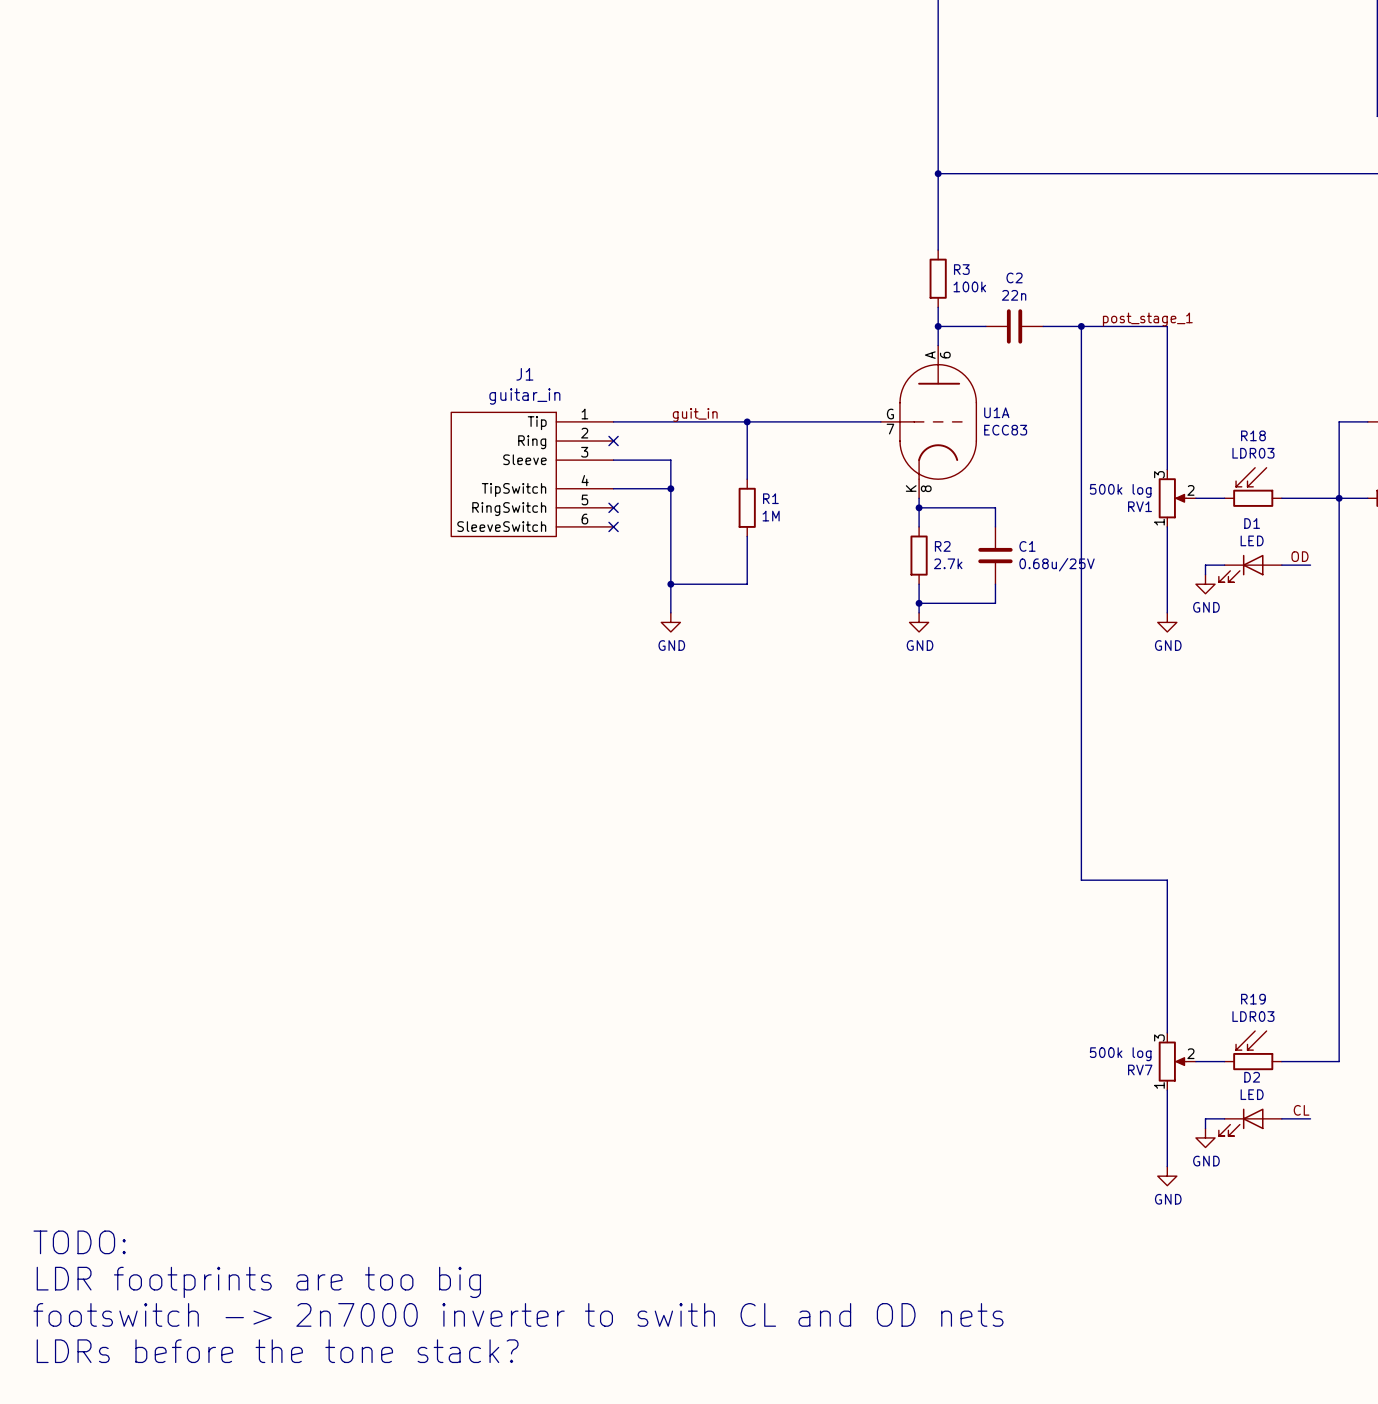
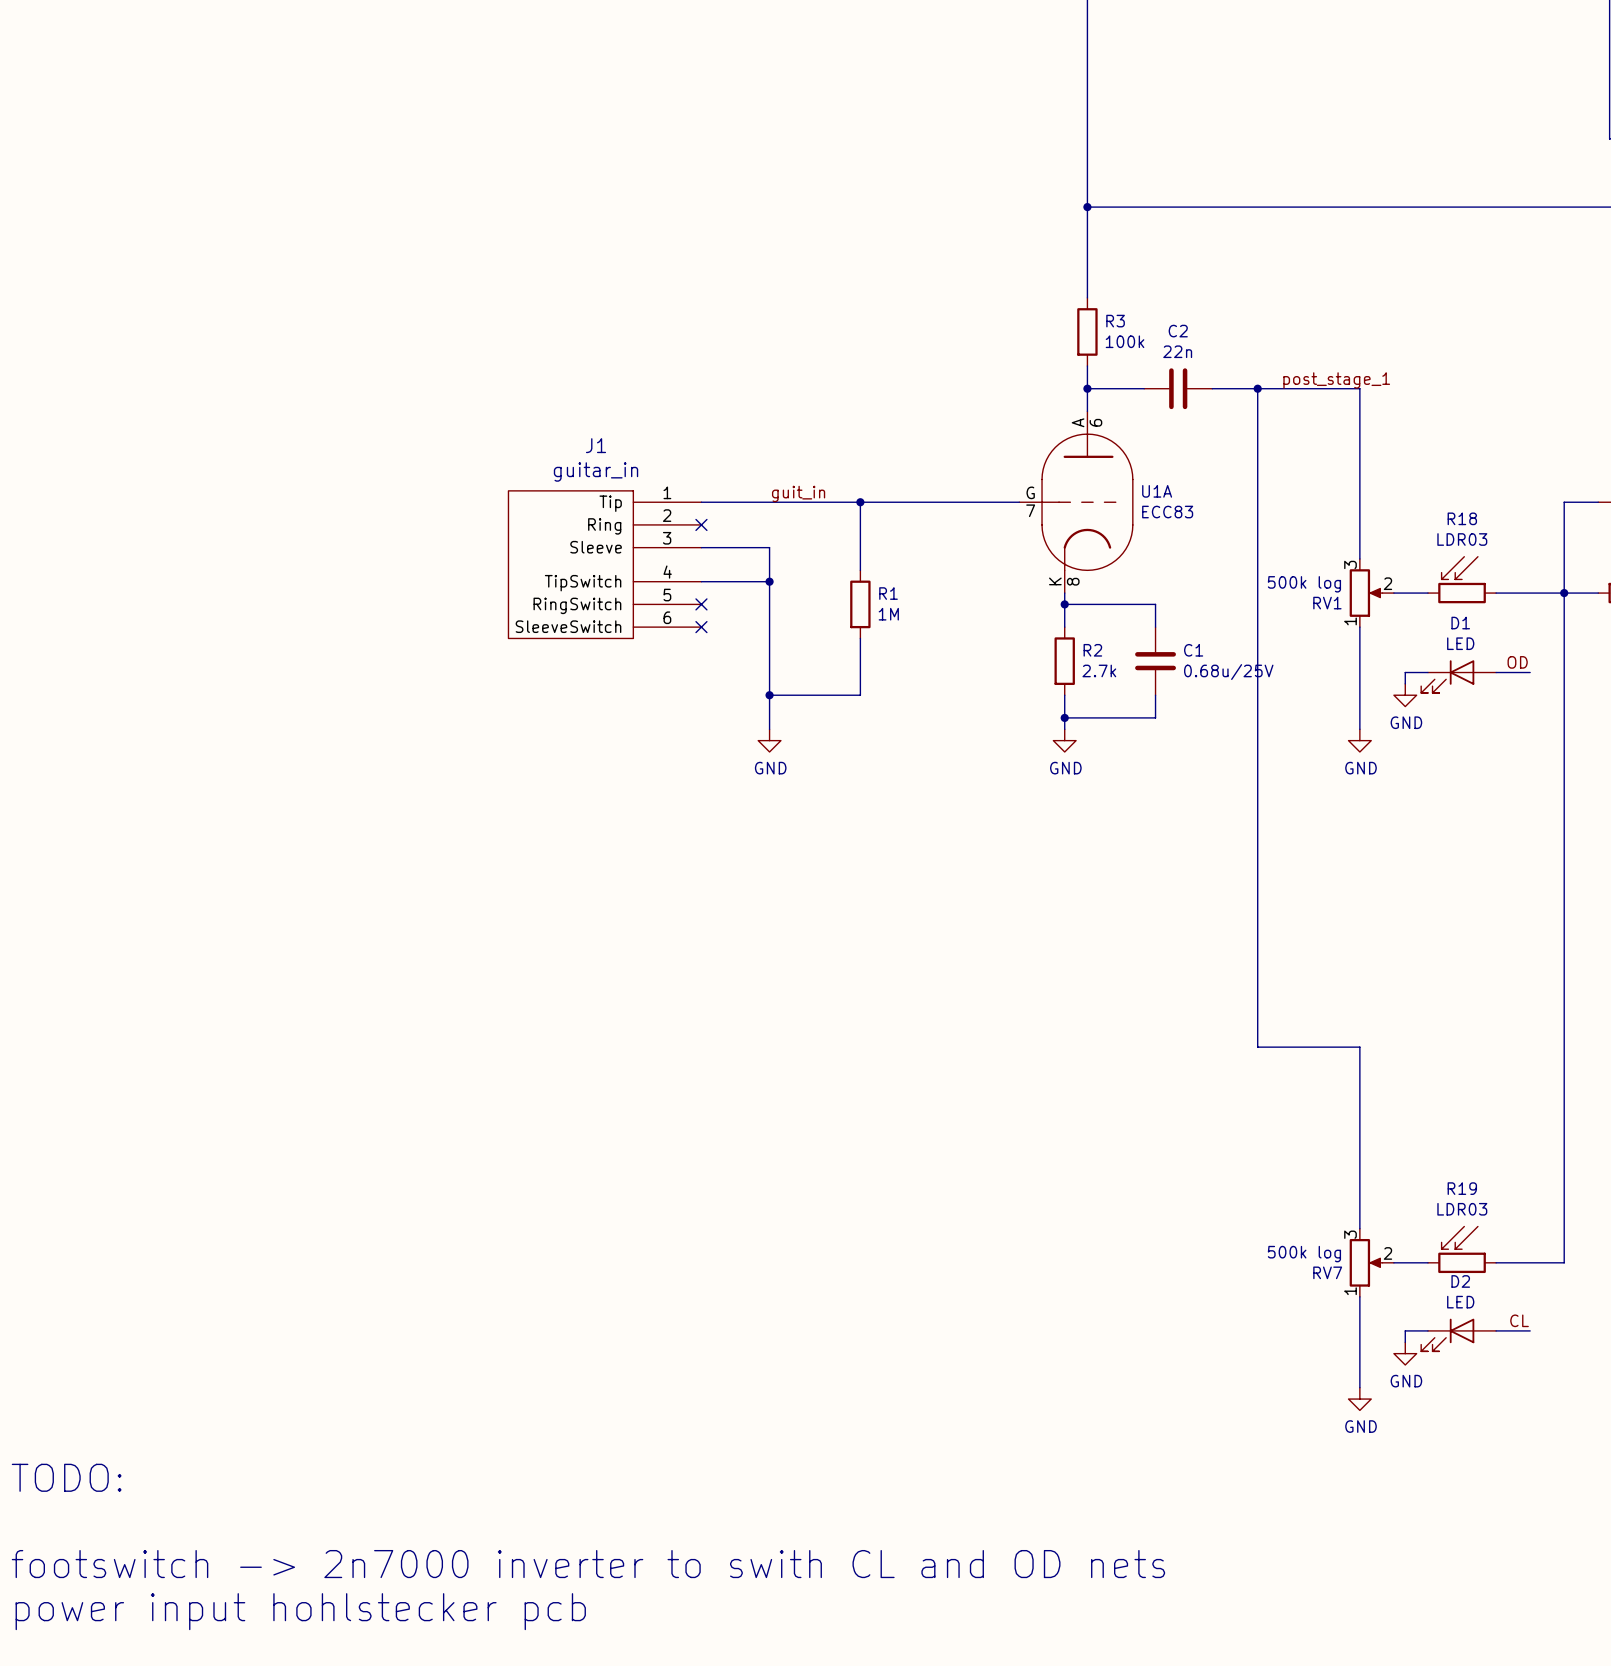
text: LDR footprints are too big (258, 1282) -> none
text: LDRs before the tone stack? (277, 1351) -> power input hohlstecker pcb (300, 1611)

